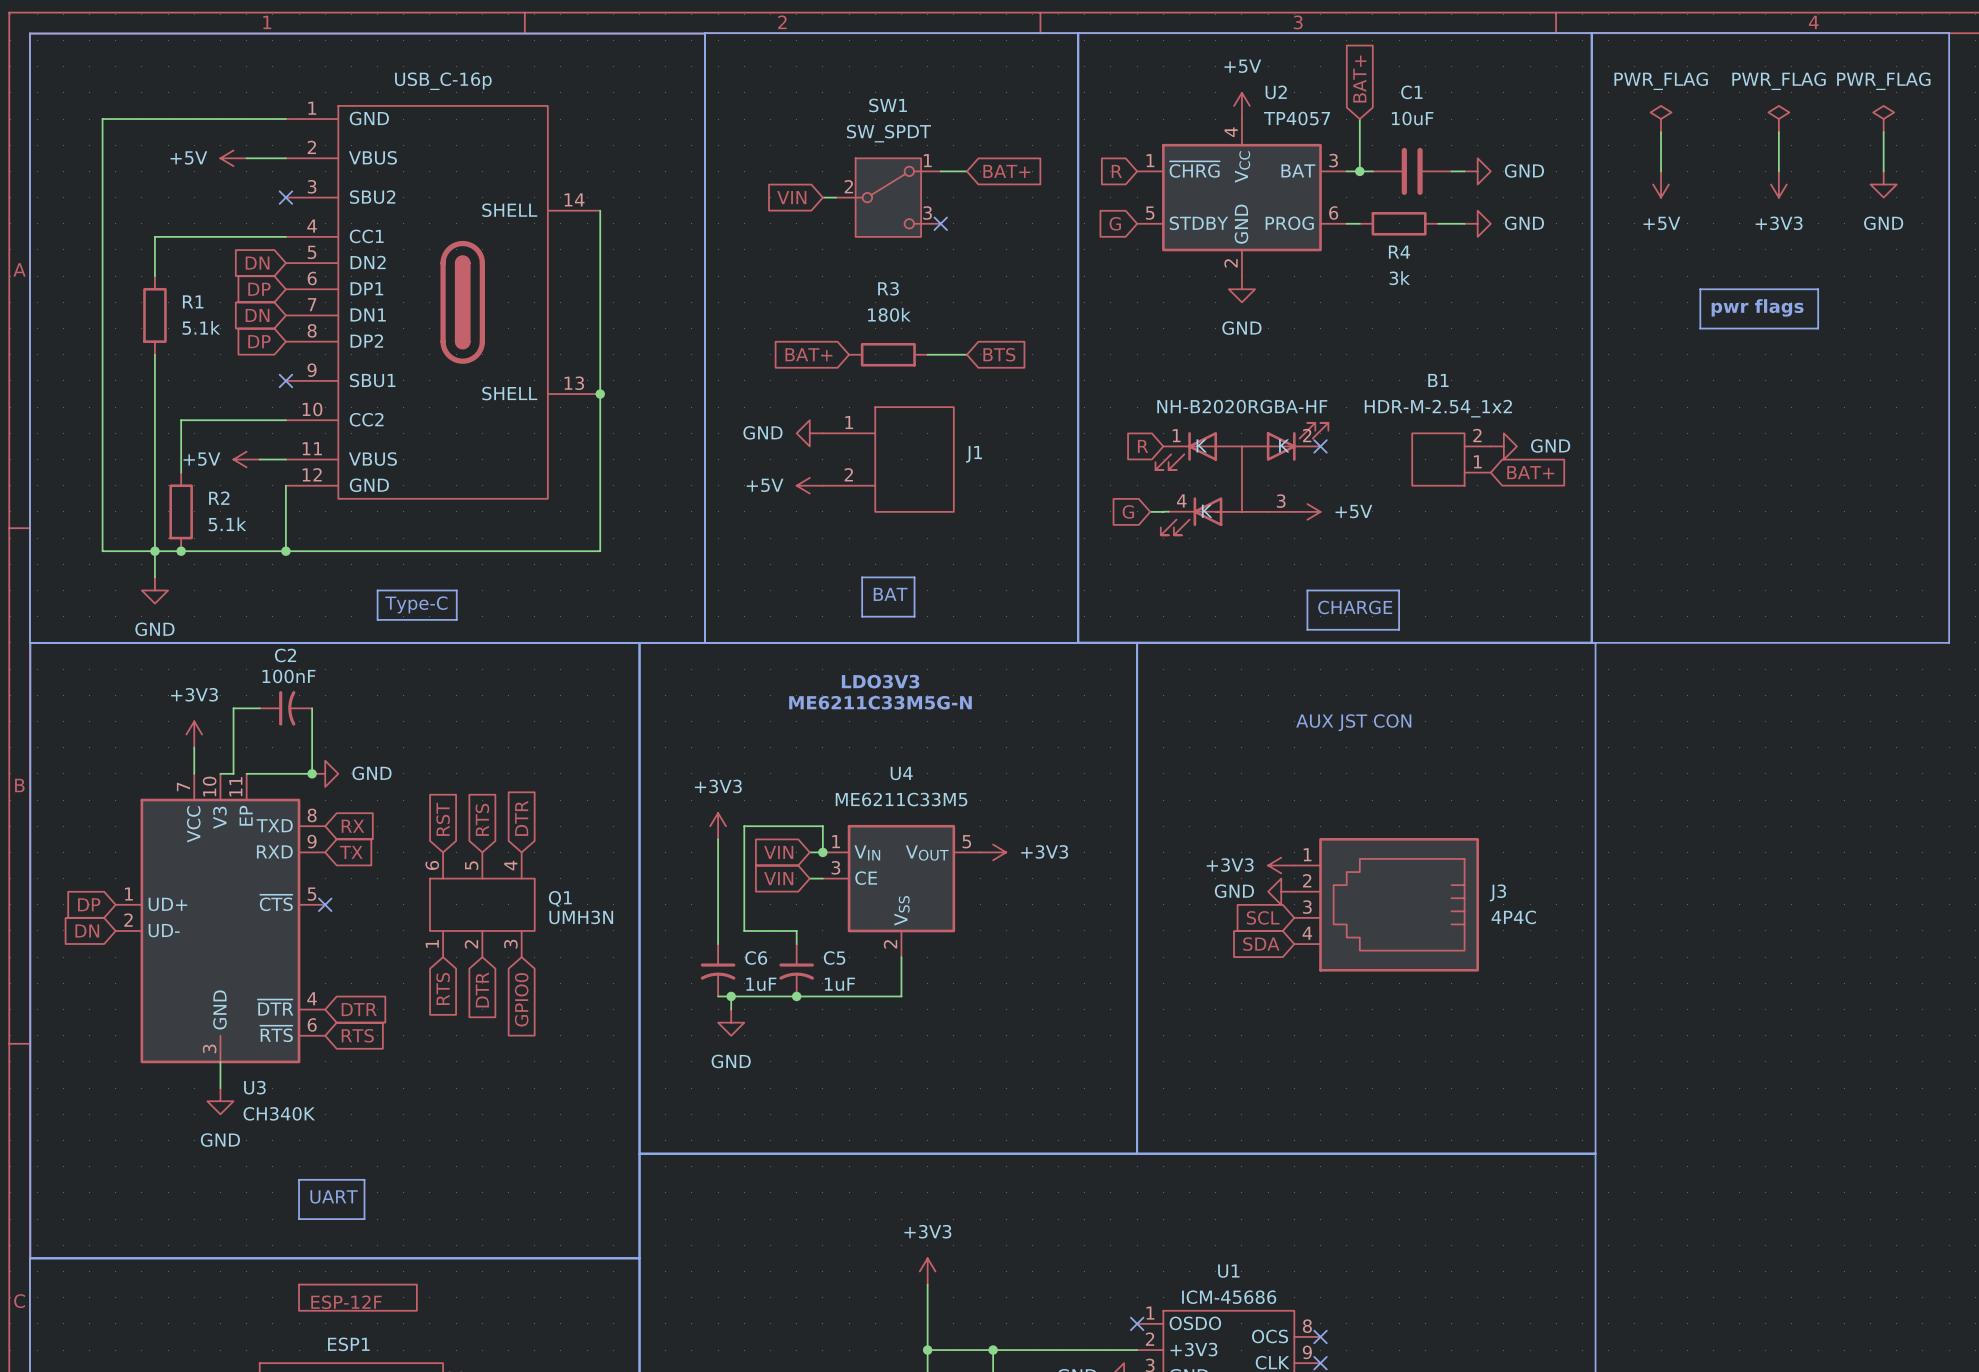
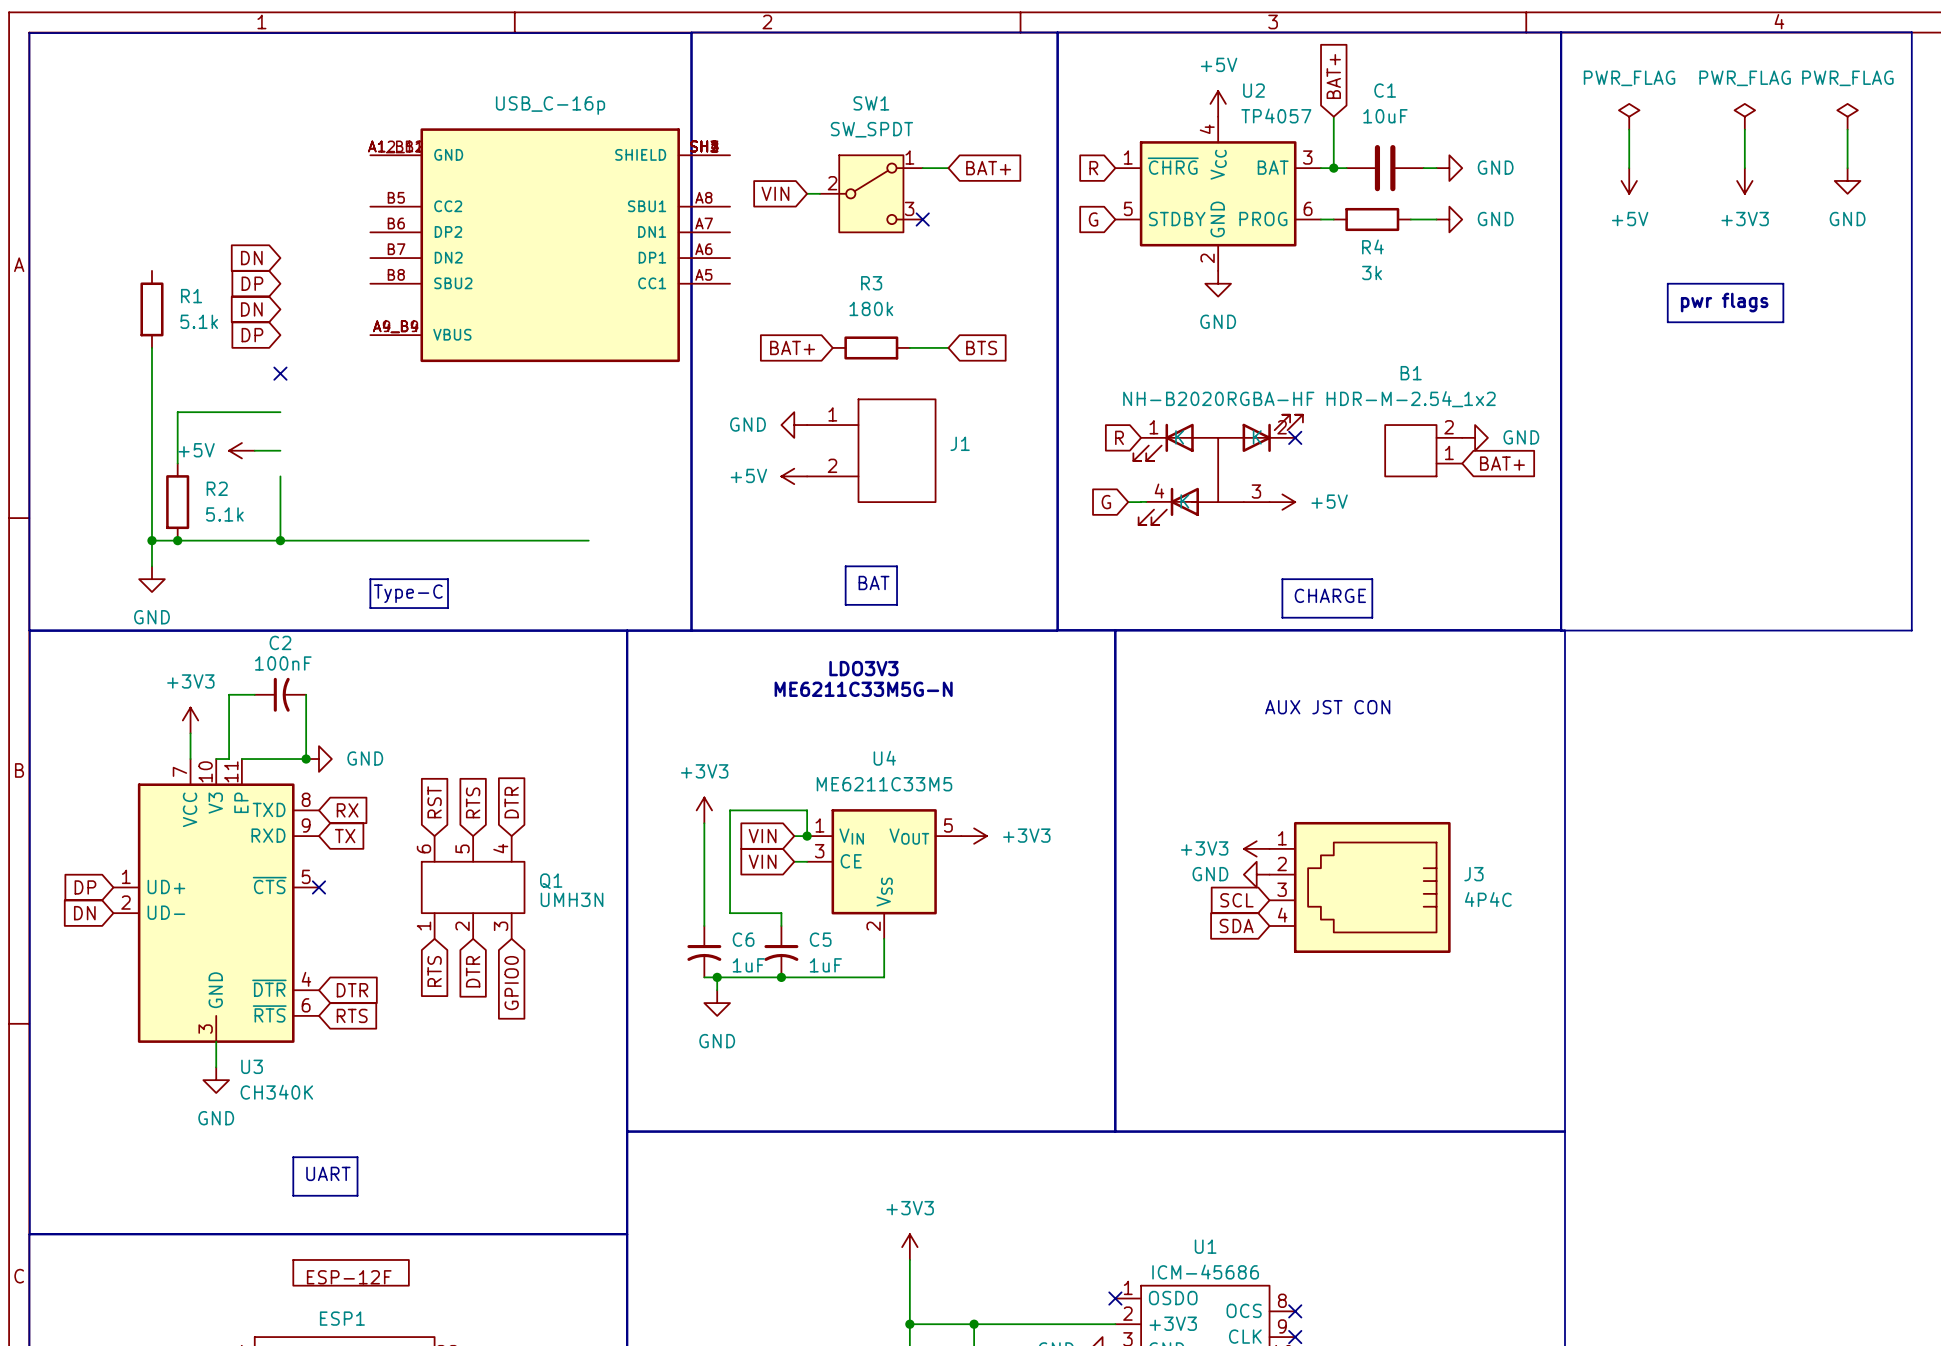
wire: (285, 119) (102, 119) (102, 551) (154, 551) -> none
power symbol: +5V (233, 158) -> none
wire: (246, 158) (285, 158) -> none
no-connect mark: (285, 197) -> none
wire: (600, 210) (600, 551) -> none
wire: (285, 236) (154, 236) (154, 276) -> none
part: none -> USB_C-16p (550, 245)
part: USB_C-16p (443, 302) -> none
junction: (600, 394) -> none

